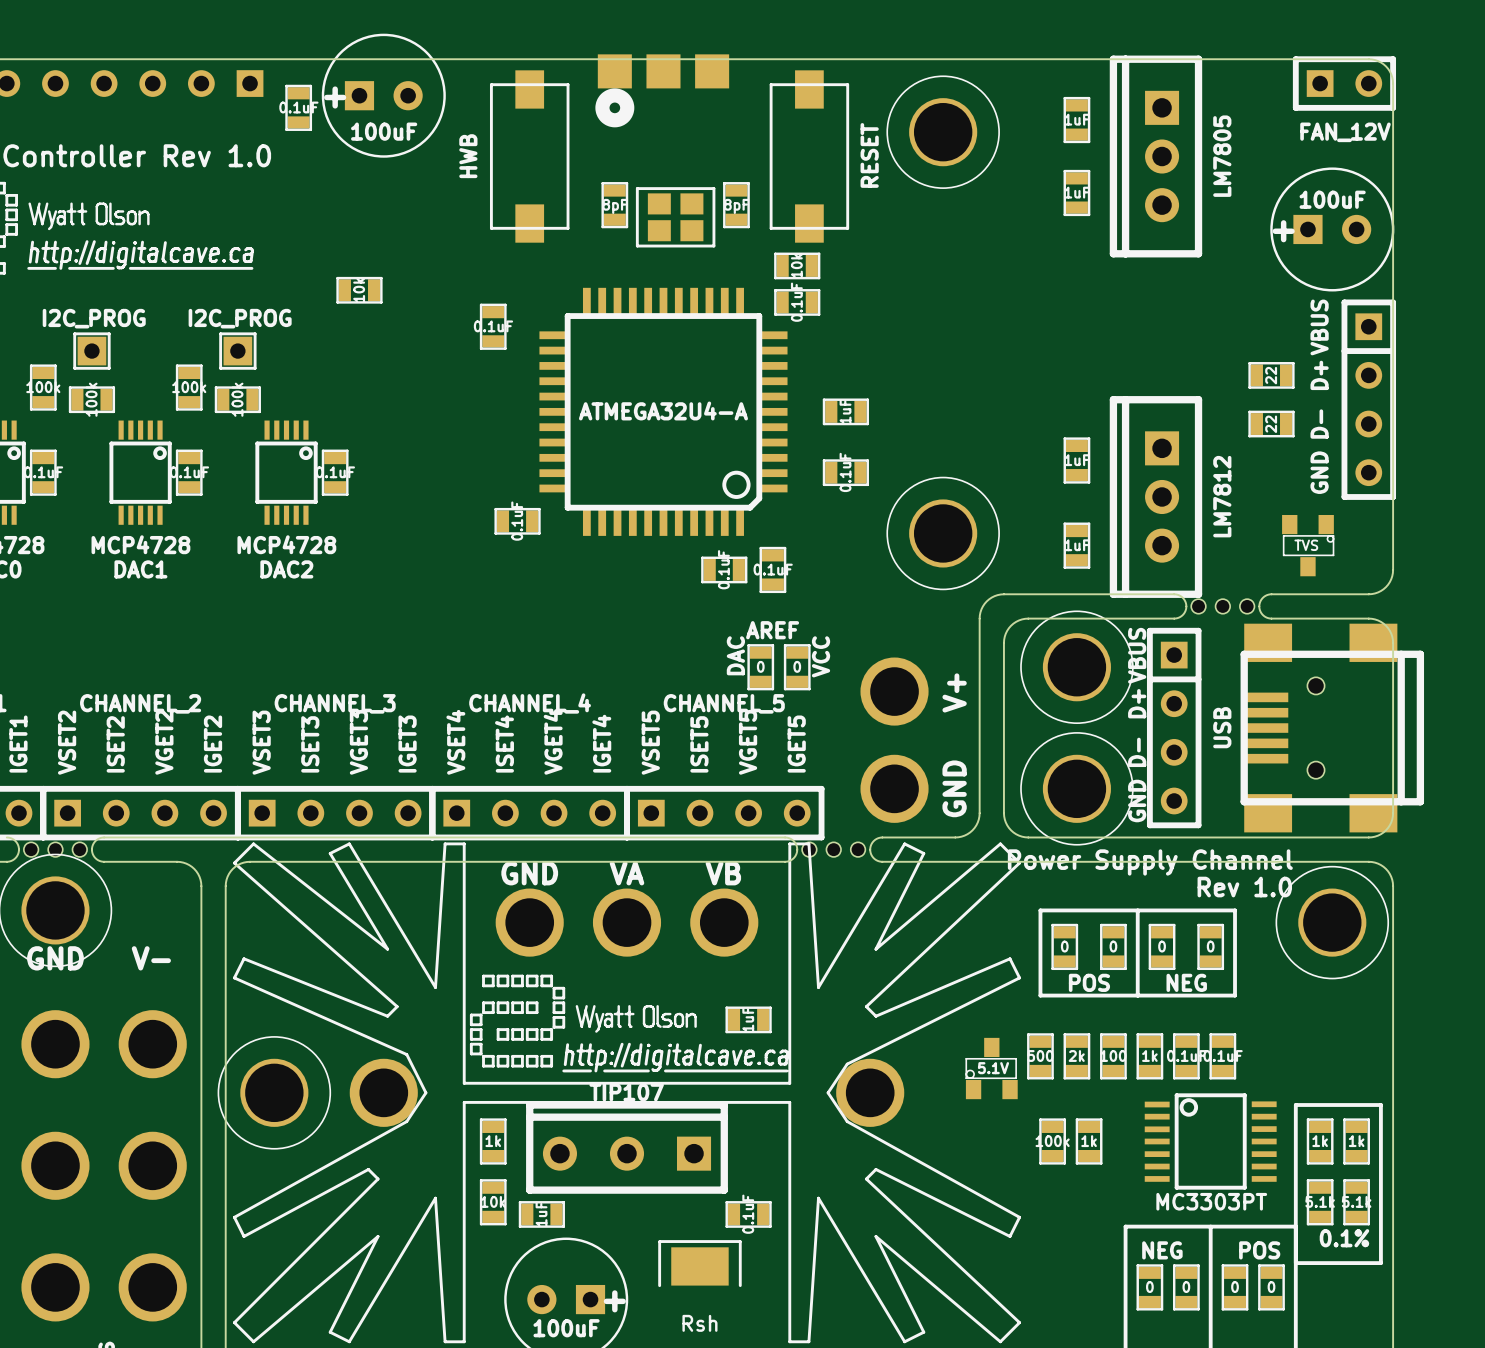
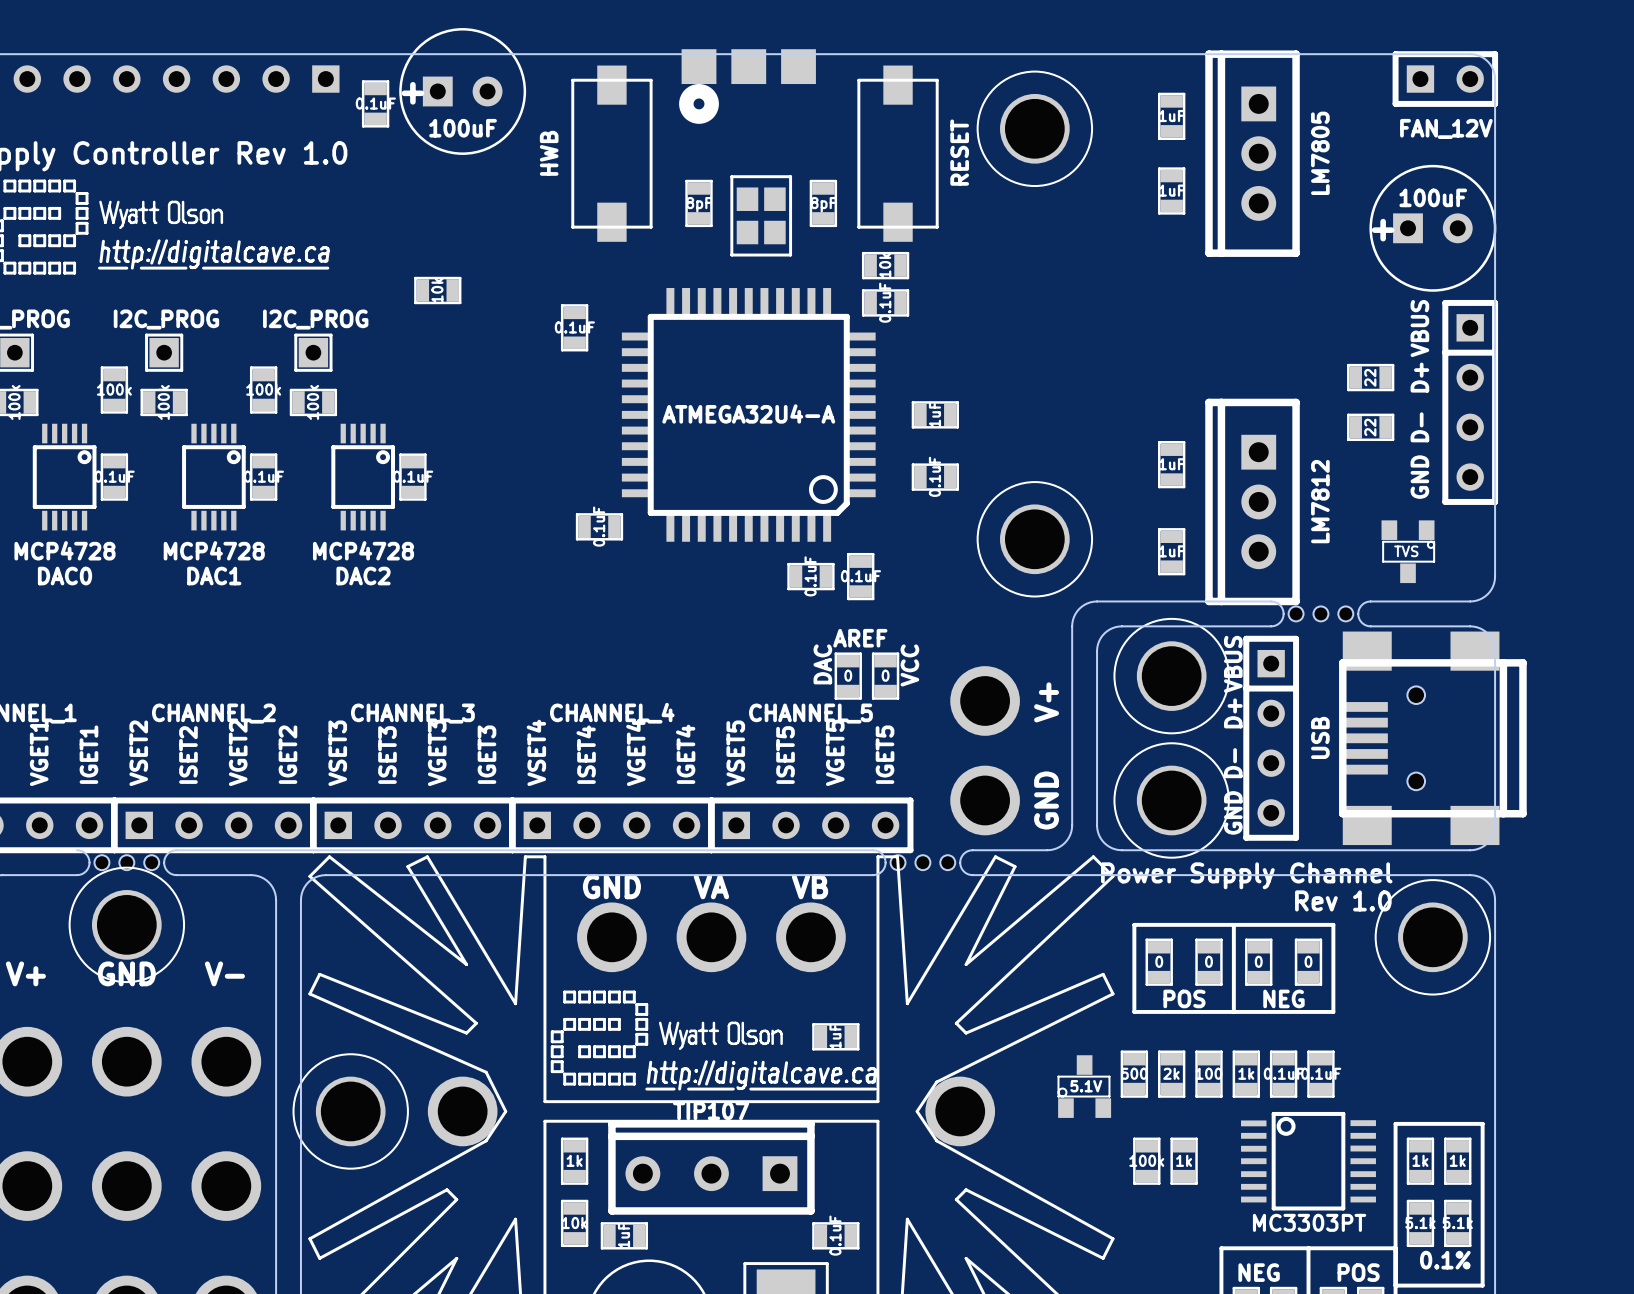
part rotation: 0° (675, 217) -> 90° clockwise (761, 215)

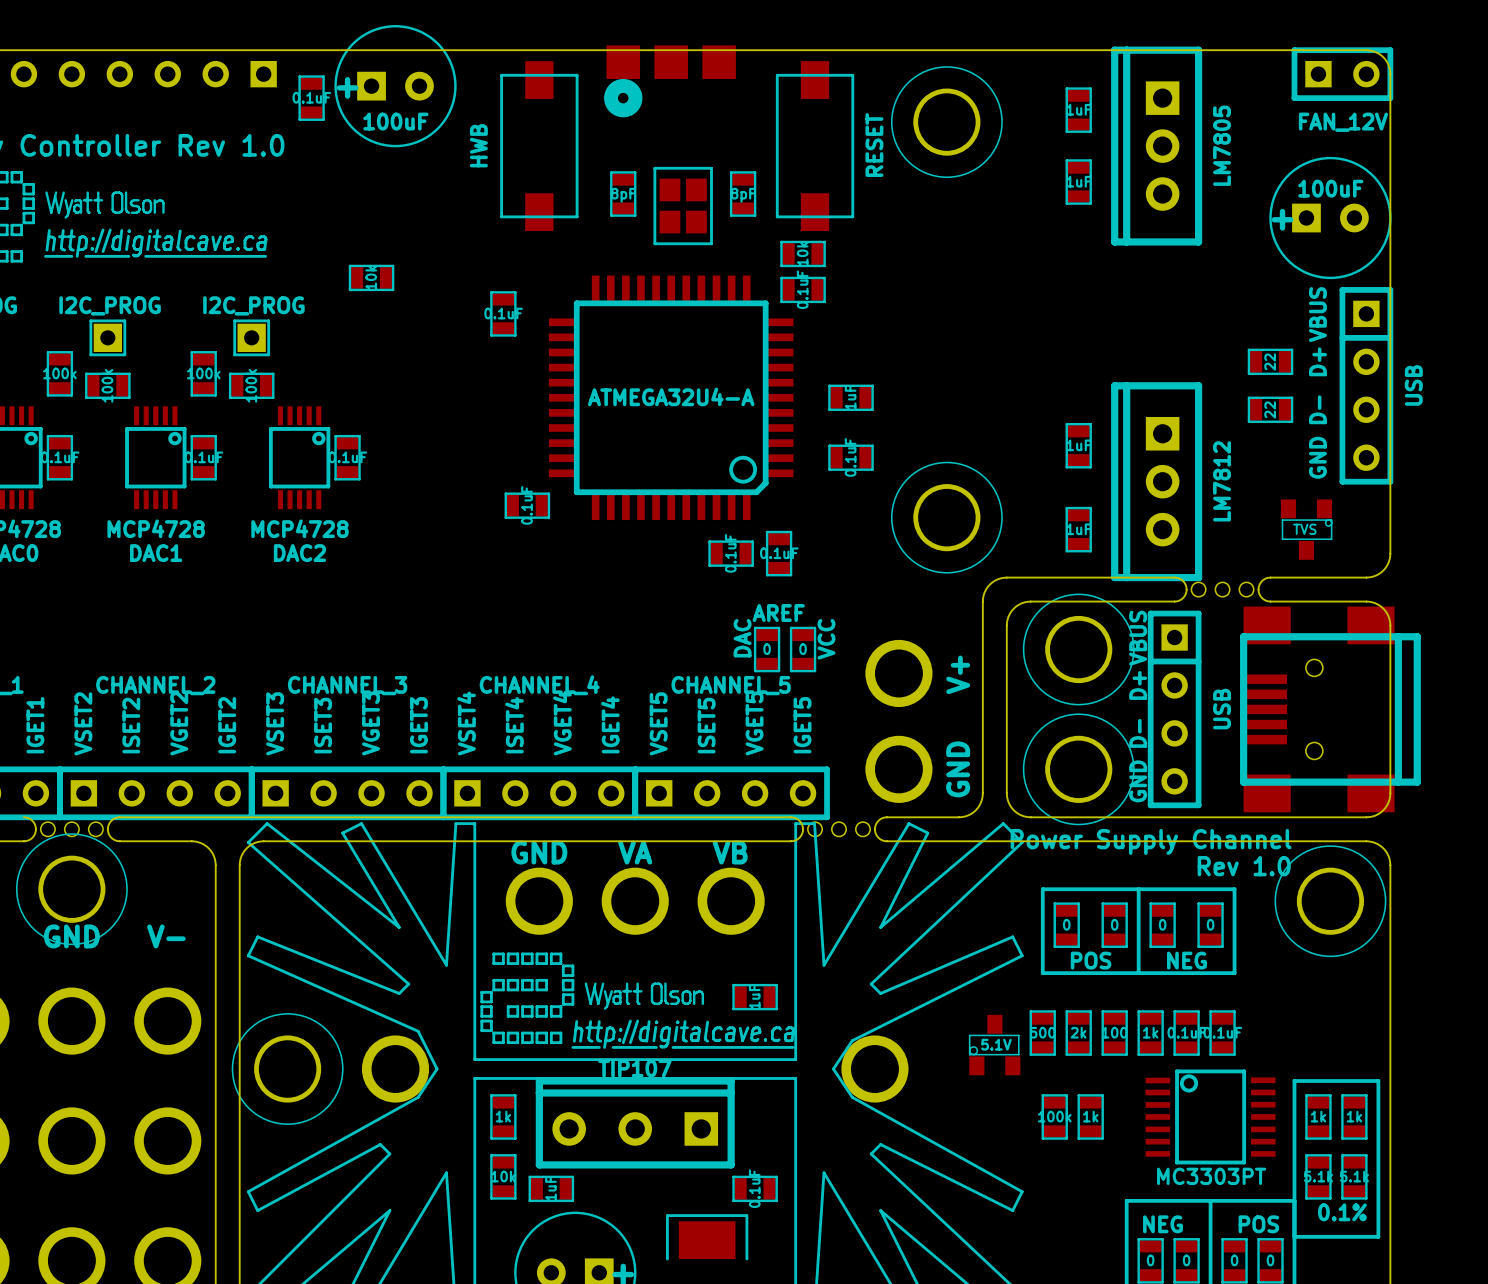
part value: none -> USB (1413, 385)

